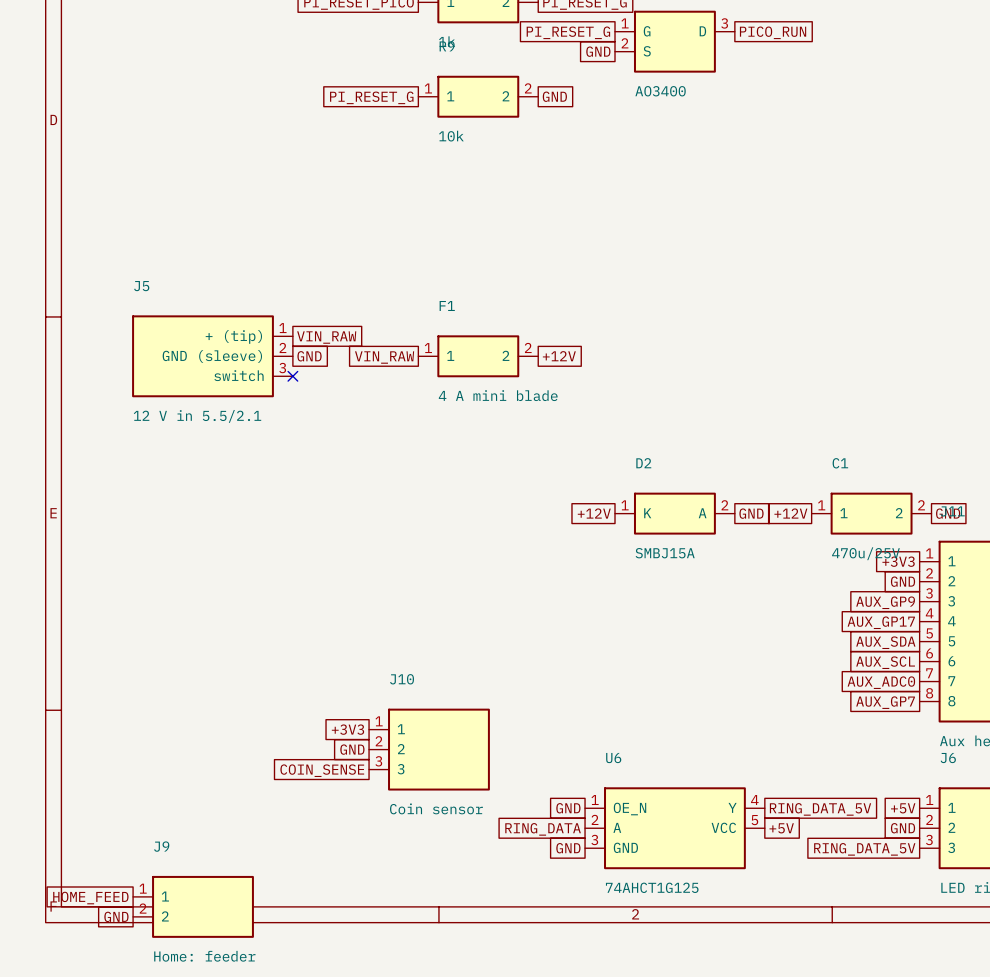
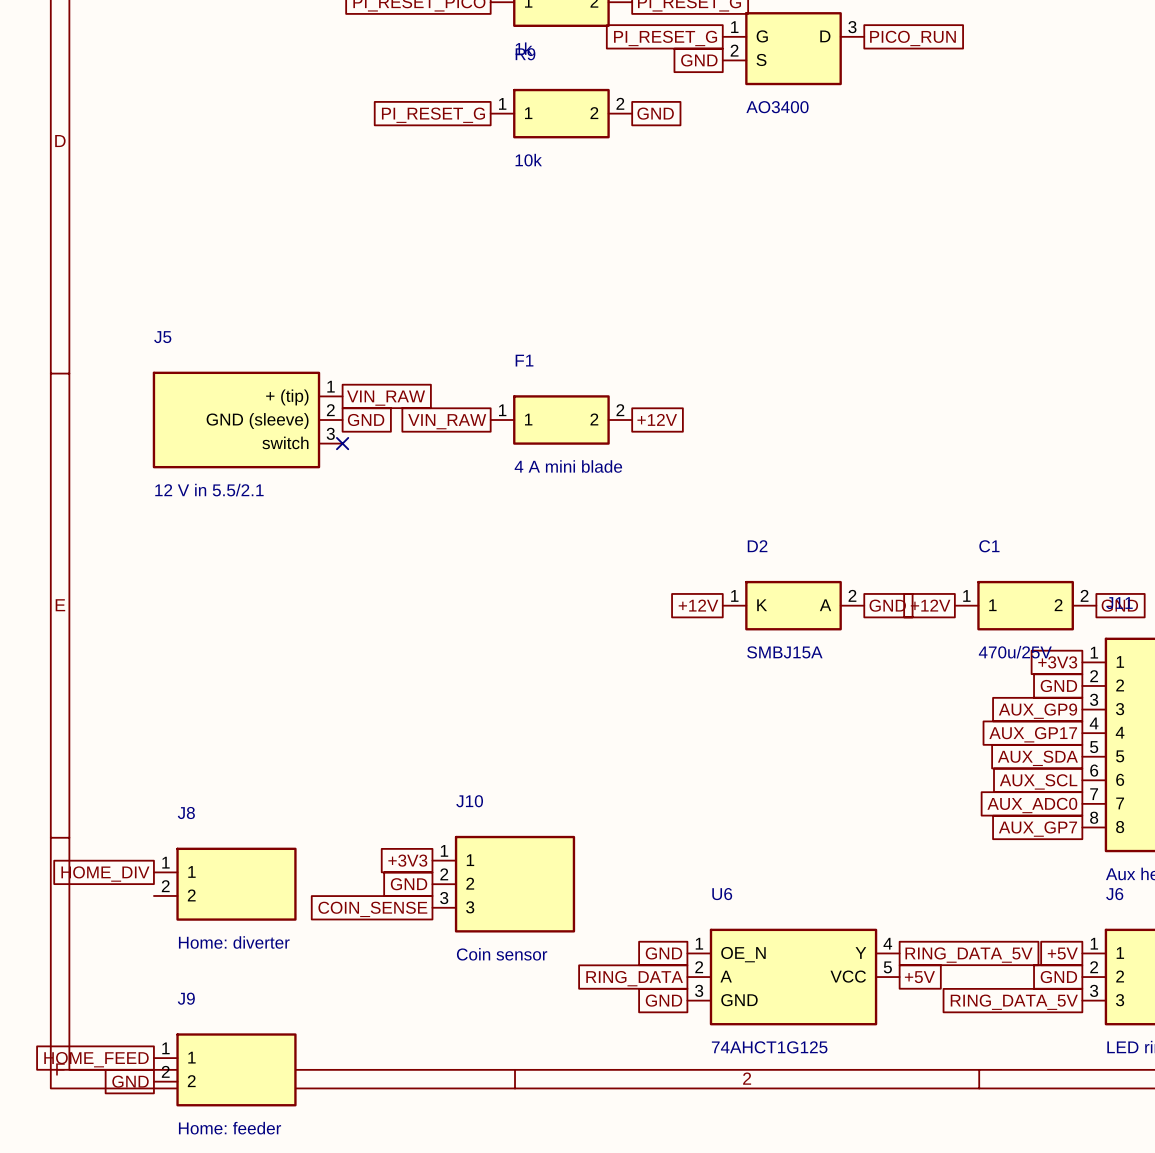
global label: none -> HOME_DIV (105, 874)
J8: none -> Home: diverter (225, 884)

